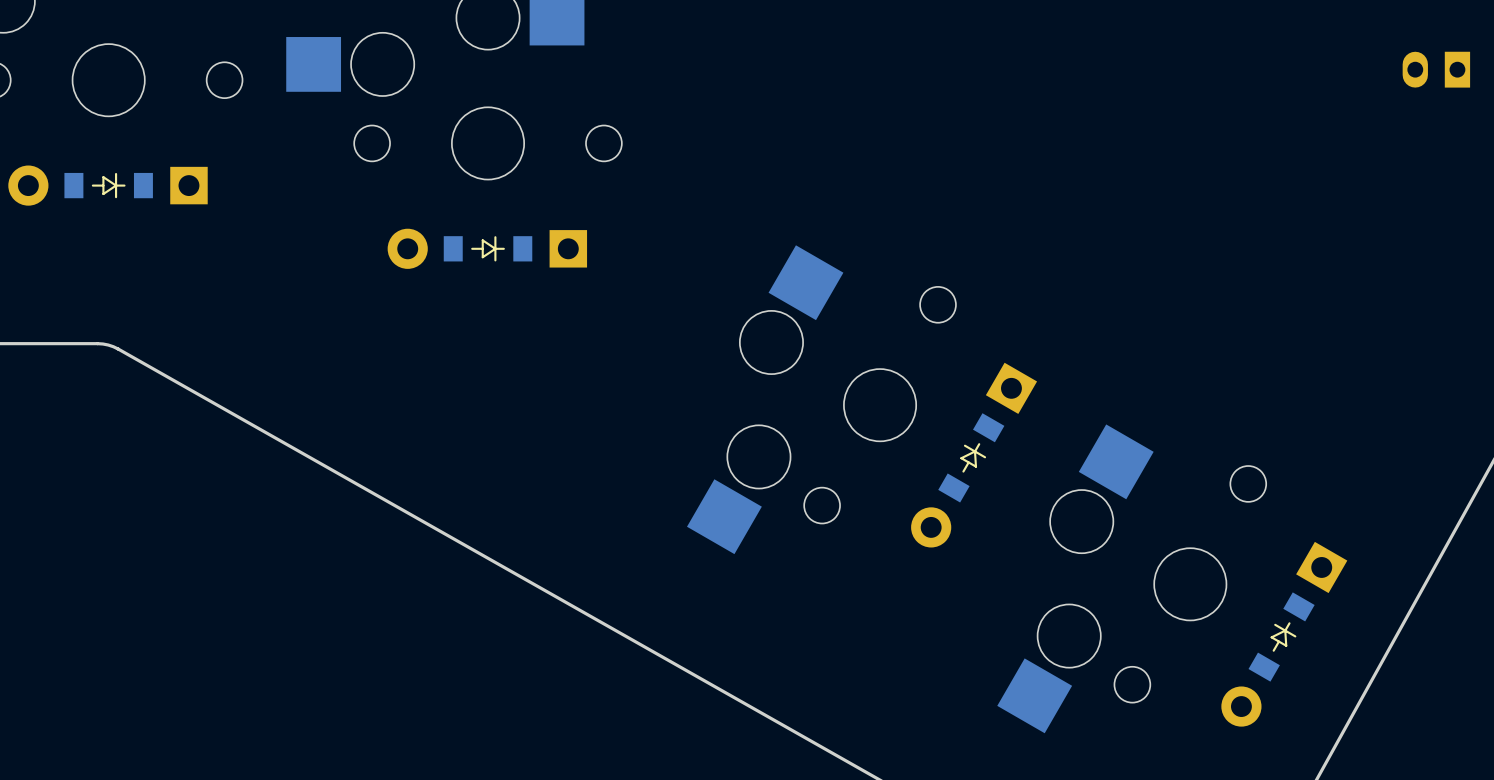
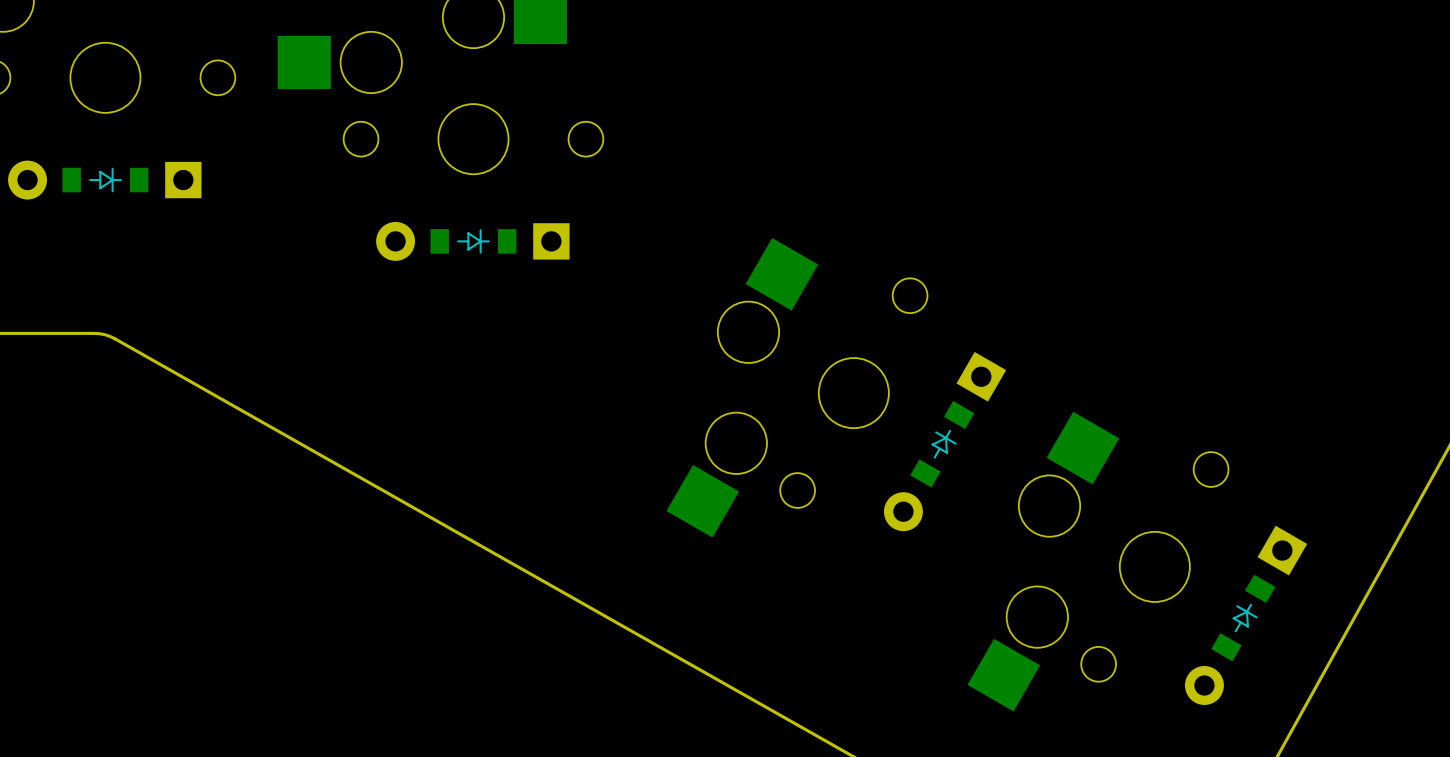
part: (1436, 69) -> none

